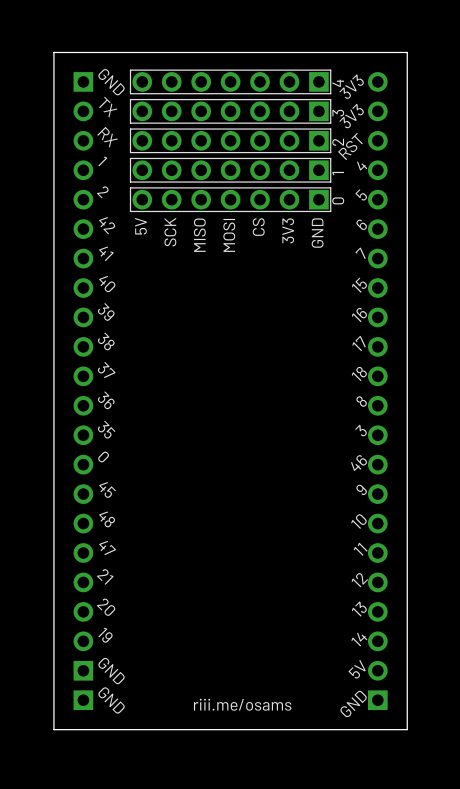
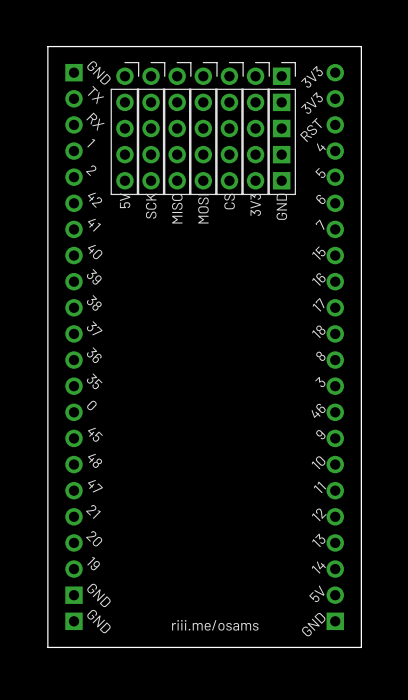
line: (330, 70) (330, 93) (130, 93) (130, 70) (330, 70) -> none
part footprint: [132, 72, 153, 210] -> [110, 61, 140, 196]
part footprint: [161, 72, 182, 210] -> [136, 61, 166, 196]
part footprint: [191, 72, 212, 210] -> [162, 61, 192, 196]
part footprint: [220, 72, 241, 210] -> [189, 61, 218, 196]
part footprint: [250, 72, 270, 210] -> [215, 61, 244, 196]
part footprint: [279, 72, 300, 210] -> [241, 61, 270, 196]
part footprint: [309, 72, 329, 210] -> [267, 61, 296, 196]
text: 4 (338, 83) -> none
line: (330, 99) (330, 123) (130, 123) (130, 99) (330, 99) -> none
text: 3 (338, 113) -> none
line: (330, 129) (330, 152) (130, 152) (130, 129) (330, 129) -> none
text: 2 (338, 142) -> none
line: (330, 158) (330, 182) (130, 182) (130, 158) (330, 158) -> none
text: 1 (338, 173) -> none
line: (330, 187) (330, 211) (130, 211) (130, 187) (330, 187) -> none
text: 0 (338, 200) -> none

